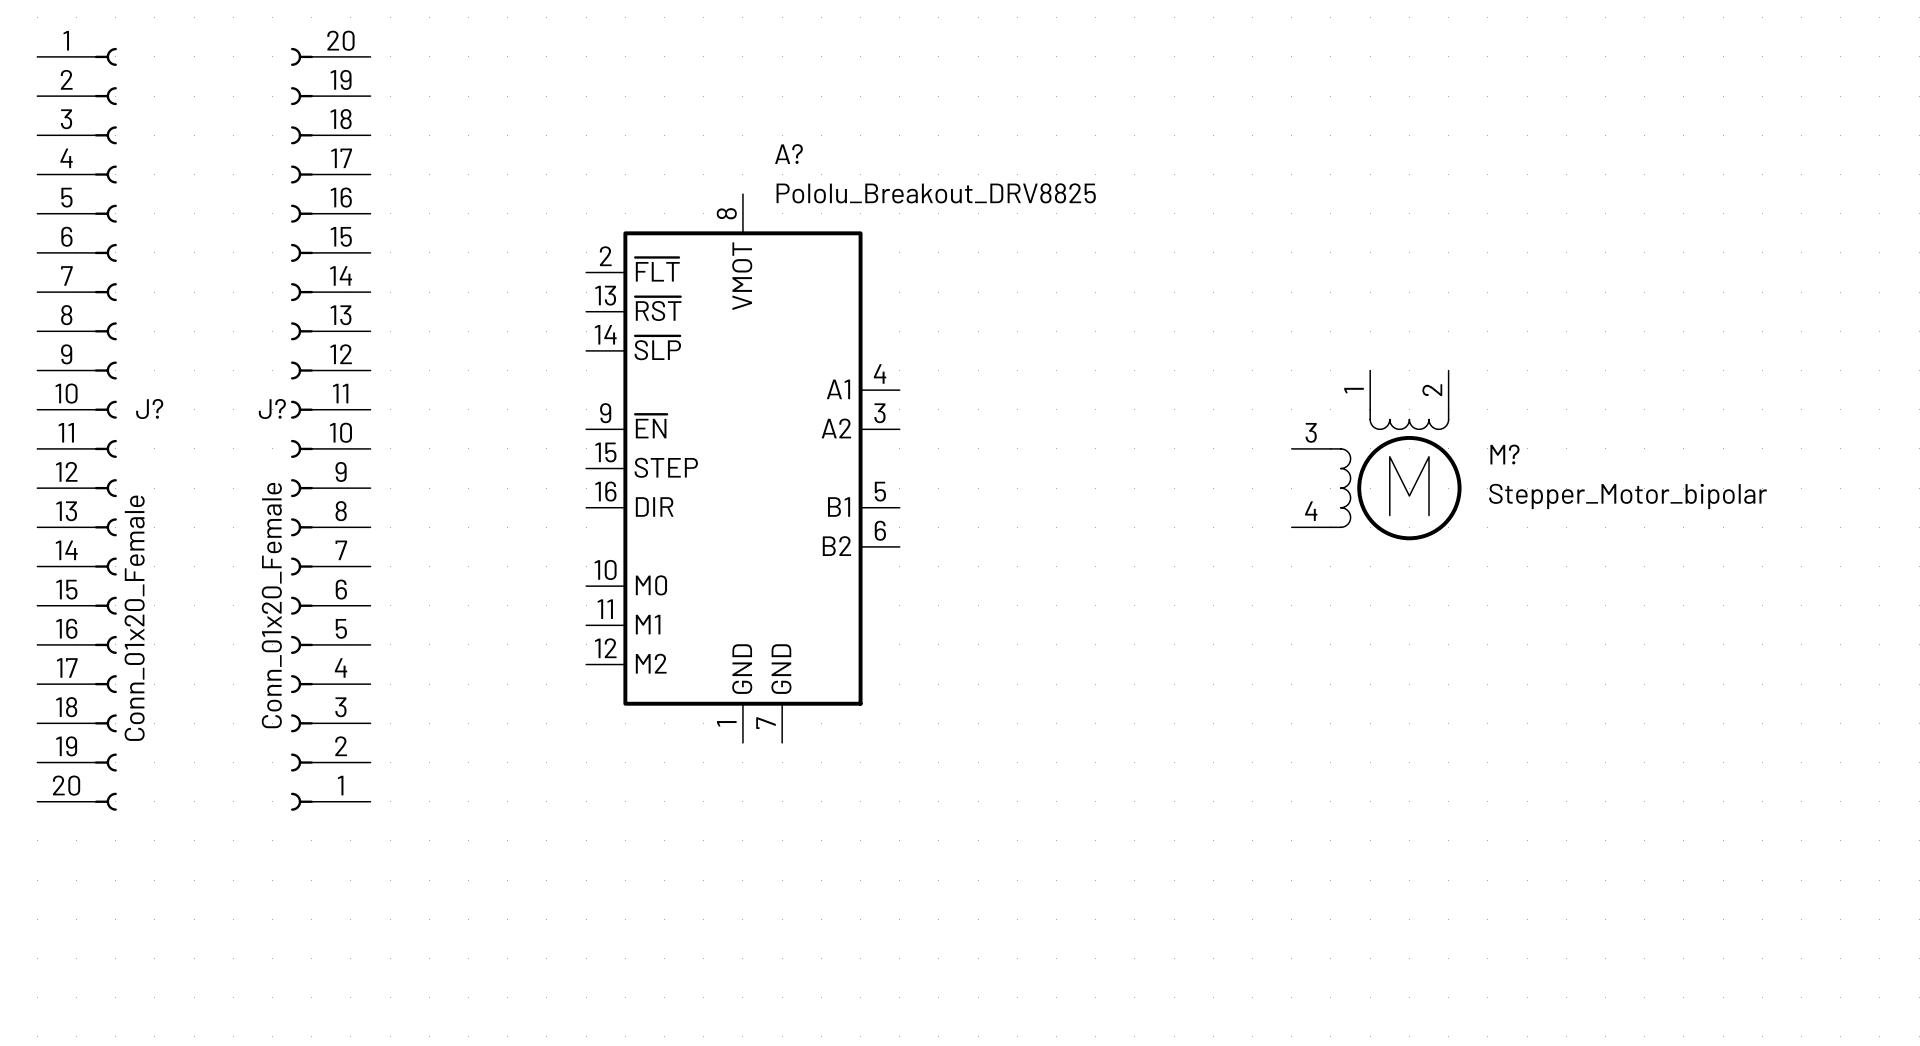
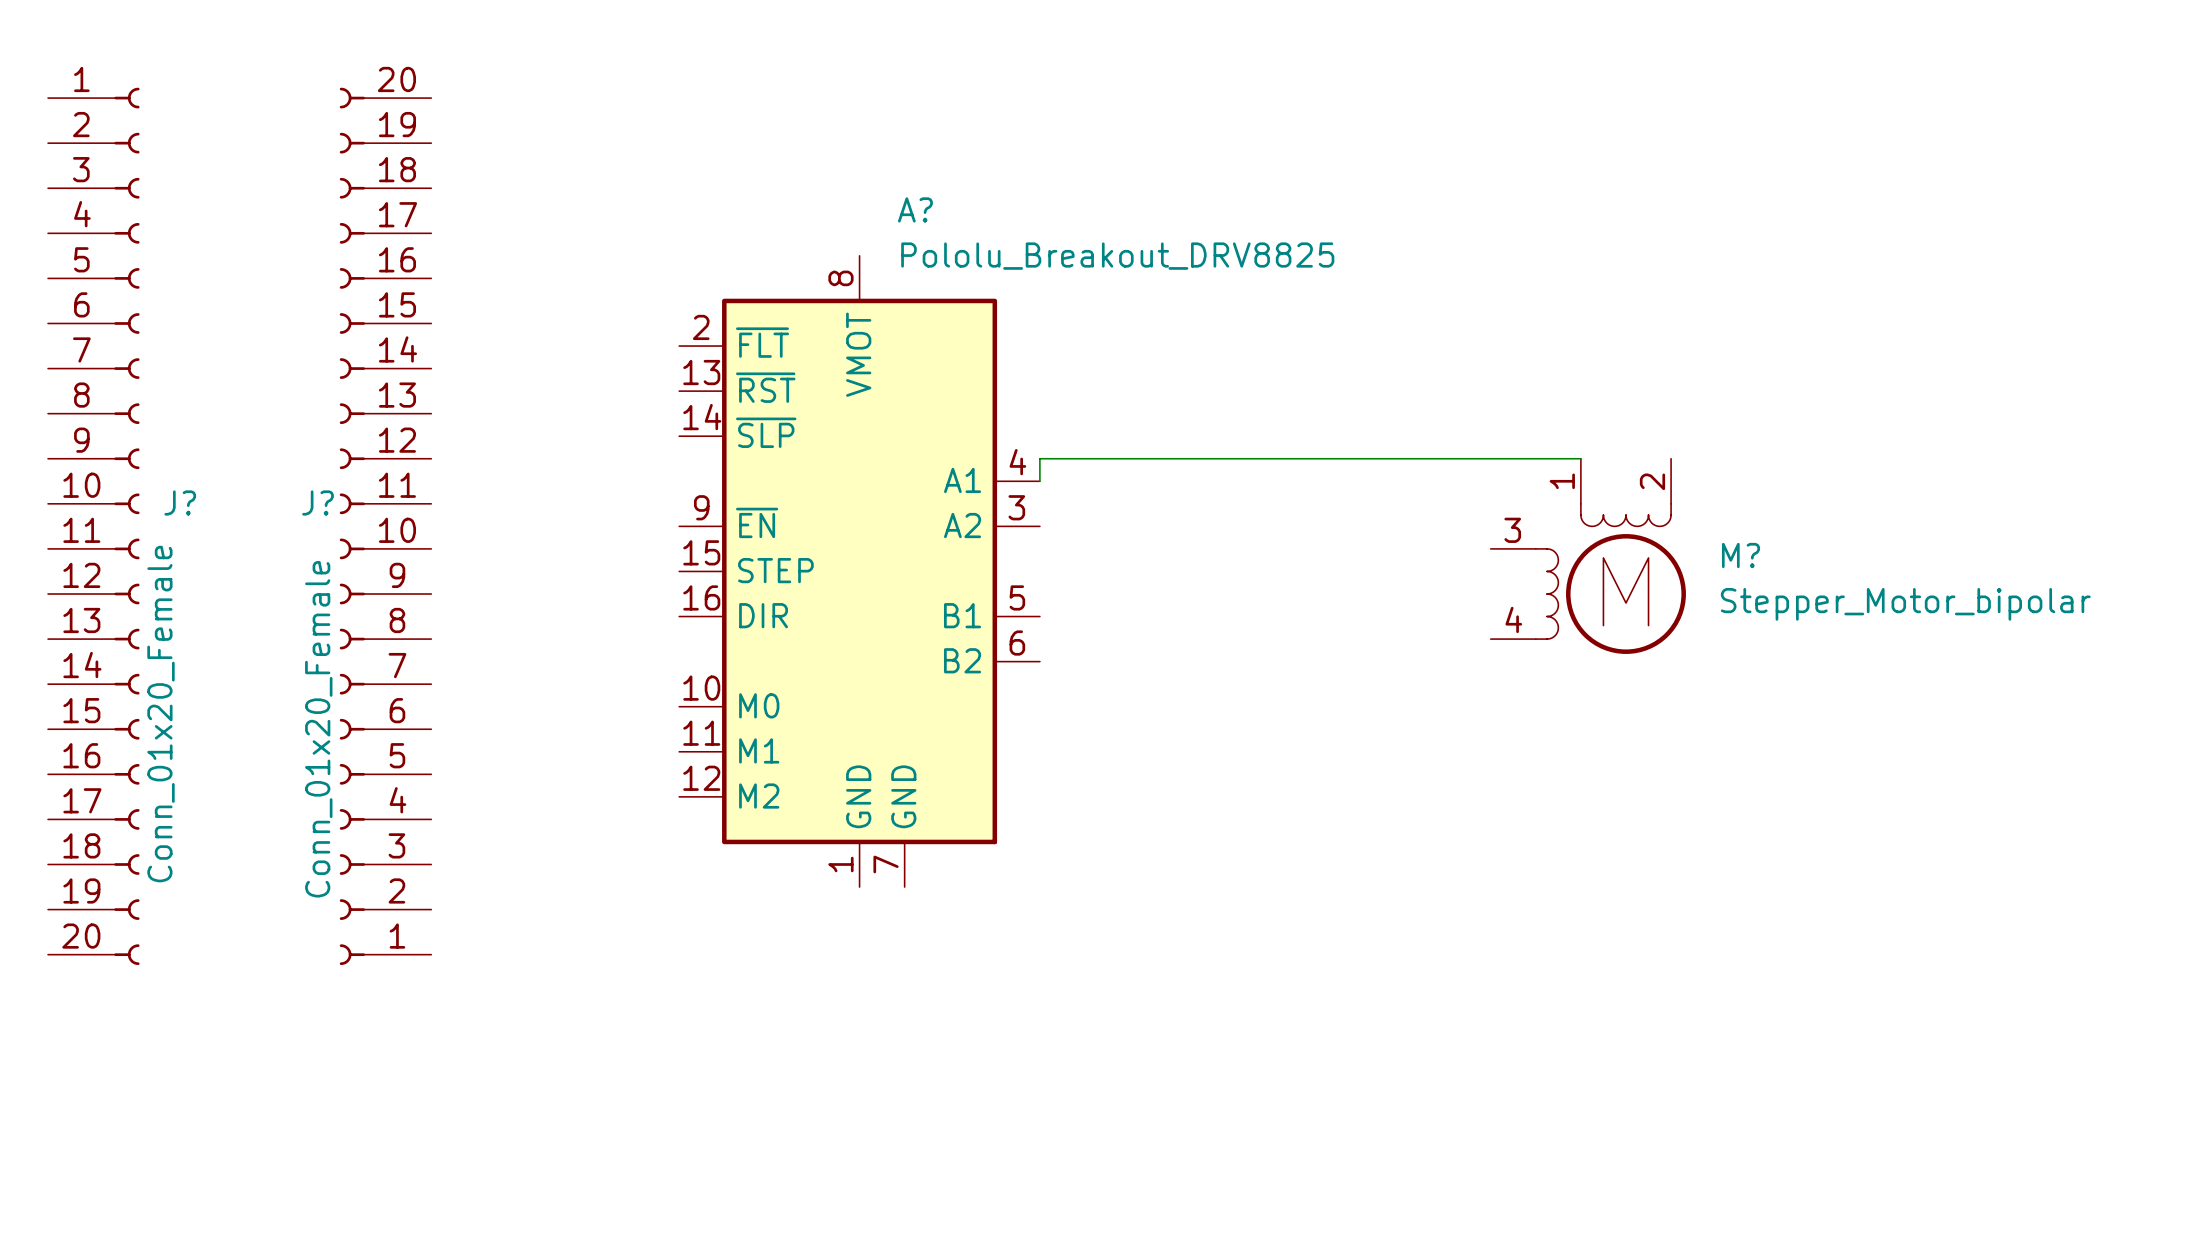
wire: none -> (1580, 458) (1039, 458) (1039, 481)

